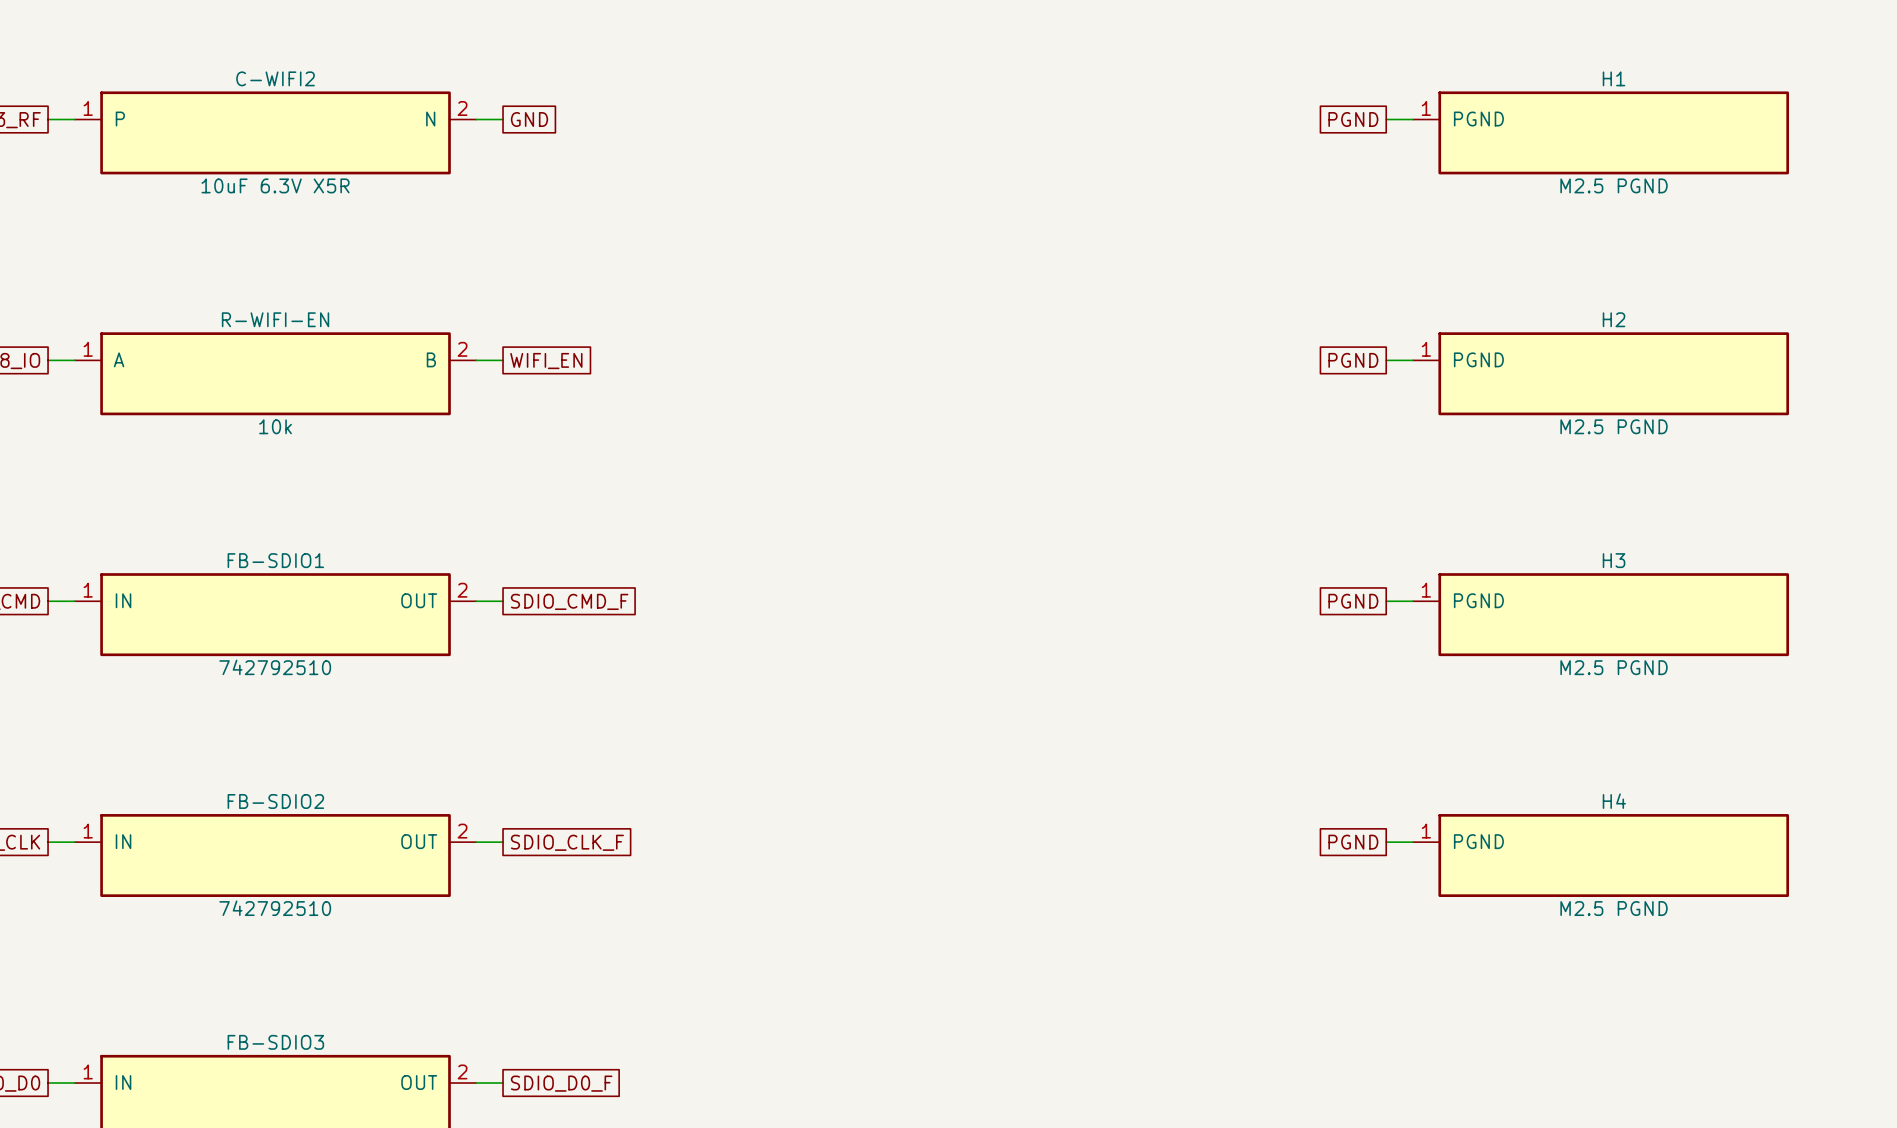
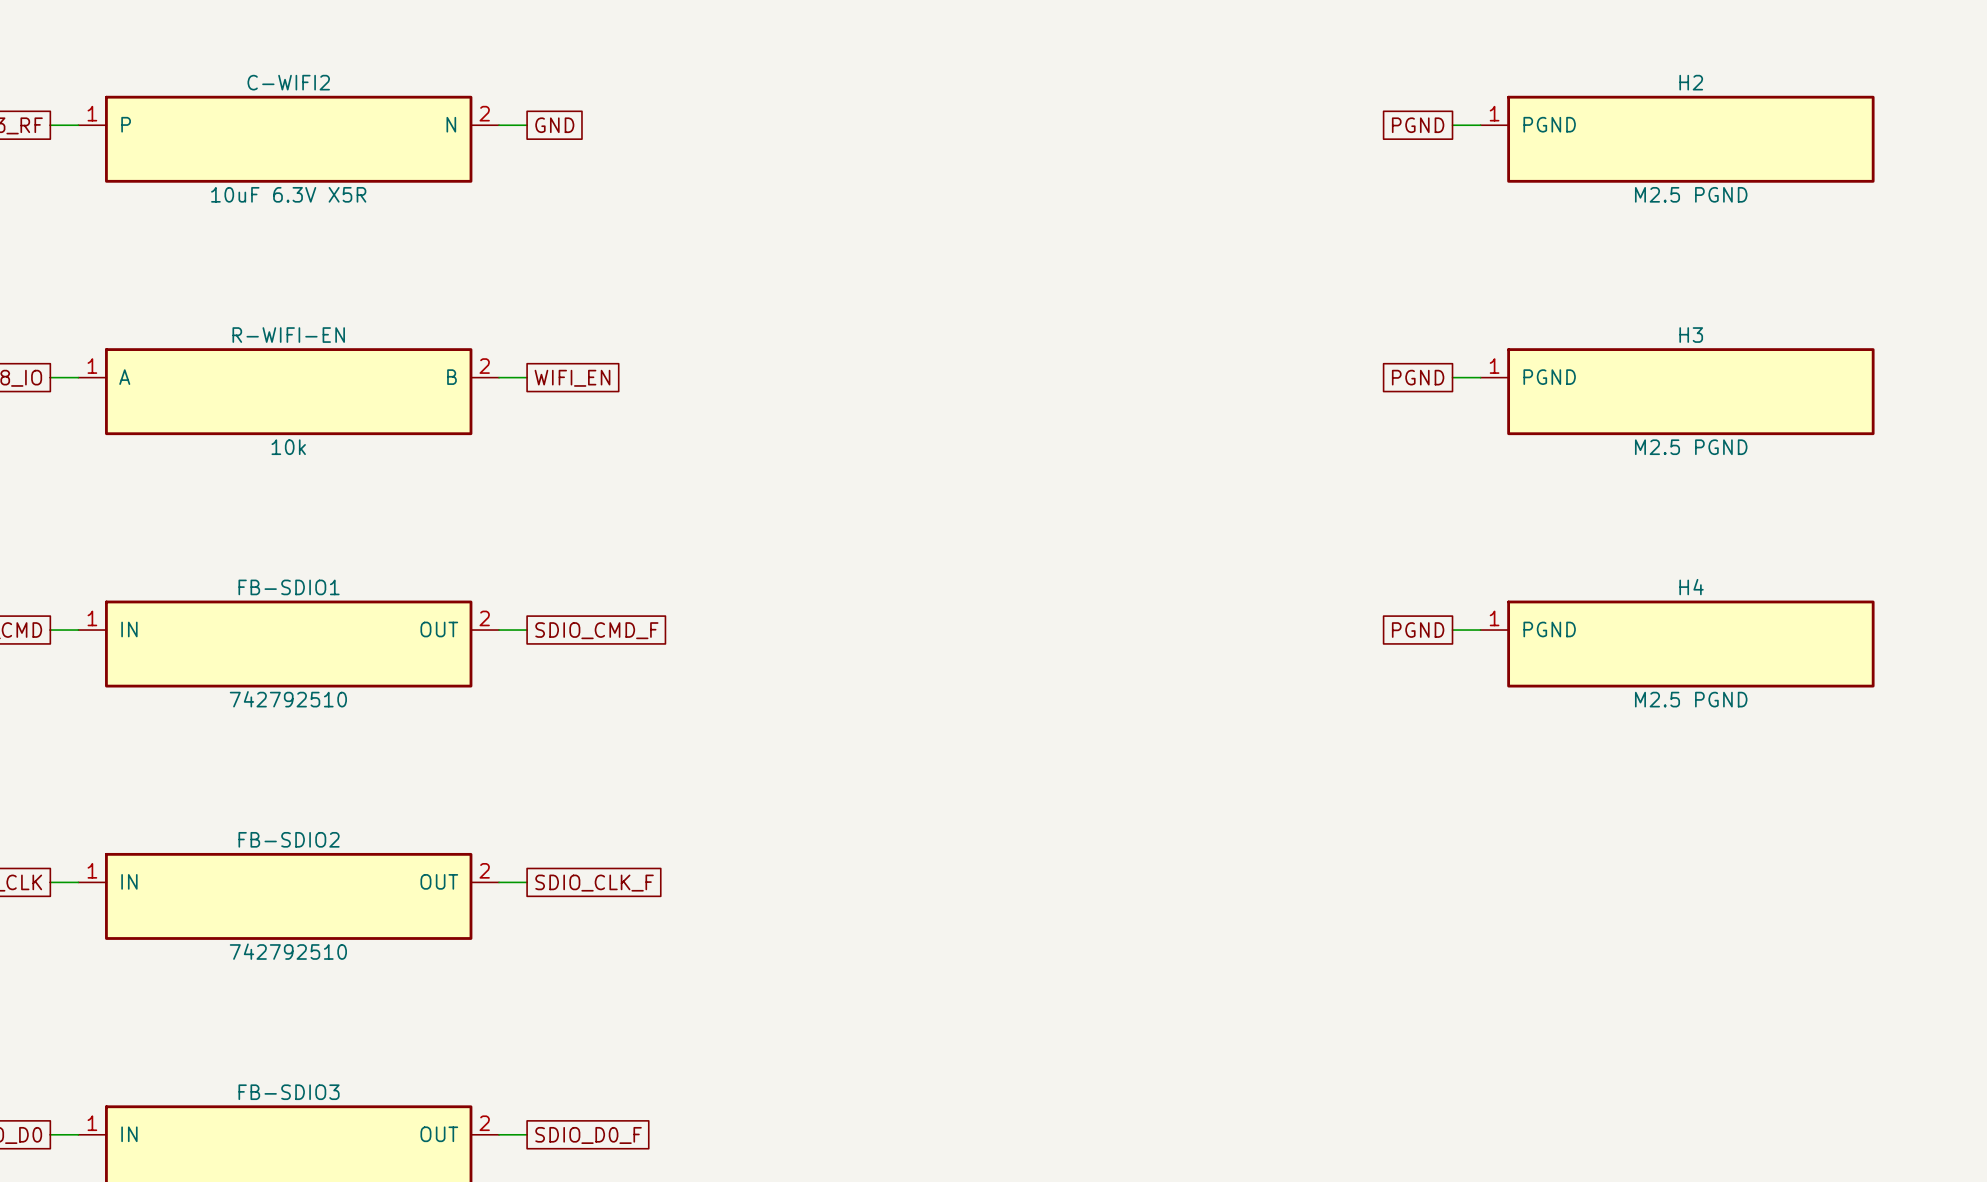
H1 name: H1 (1614, 78) -> H2 (1691, 82)
H2 name: H2 (1614, 319) -> H3 (1691, 335)
H3 name: H3 (1614, 560) -> H4 (1691, 587)
global label: PGND (1353, 842) -> none
wire: (1386, 842) (1412, 842) -> none
H4: M2.5 PGND (1600, 855) -> none

